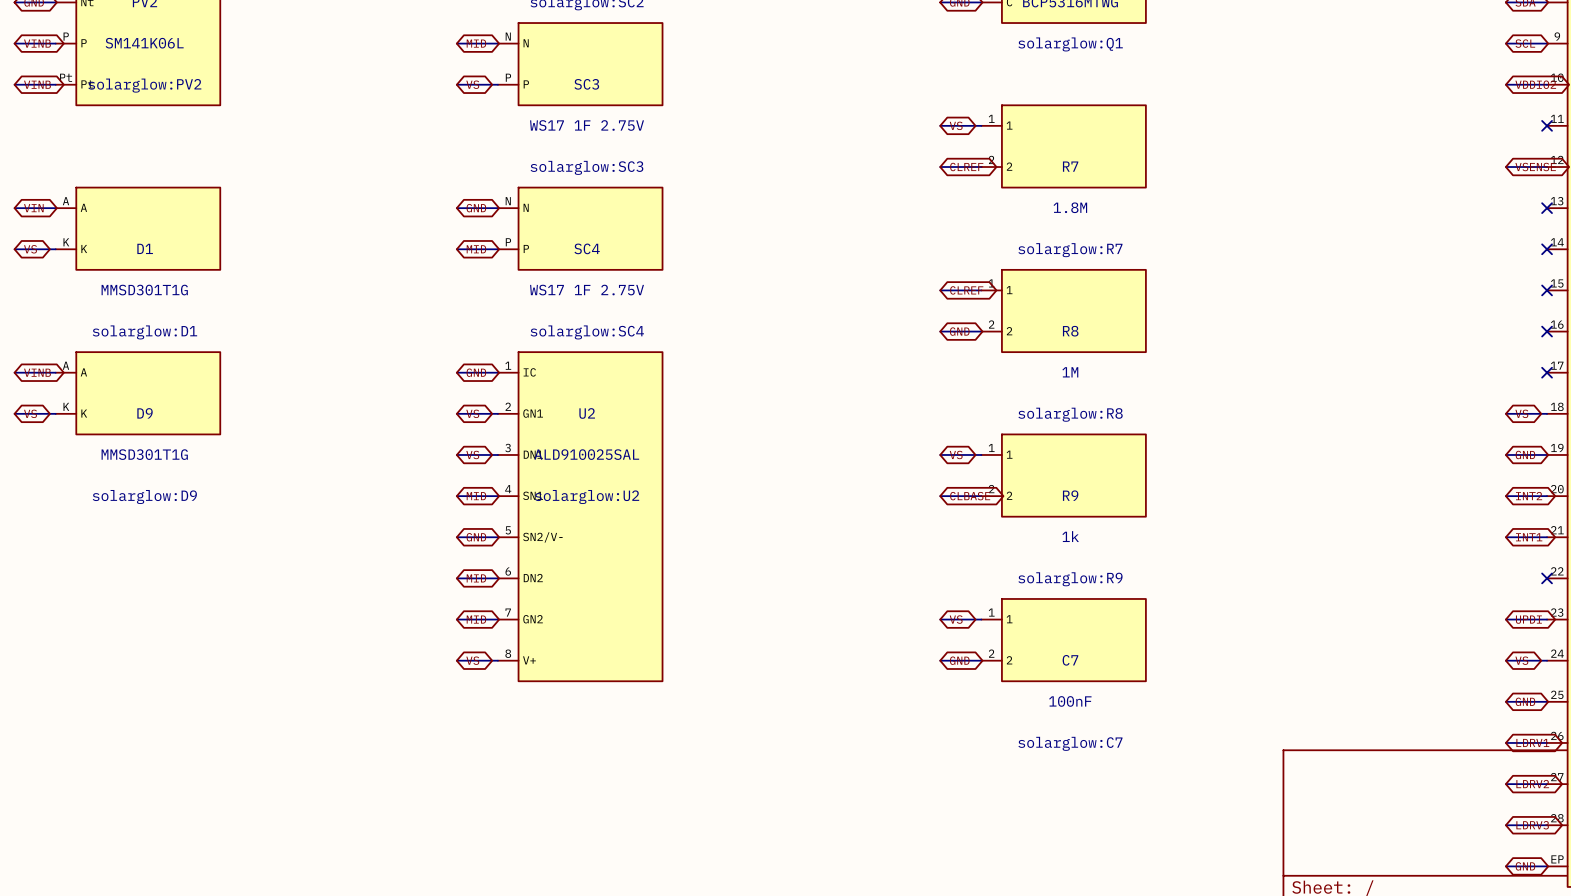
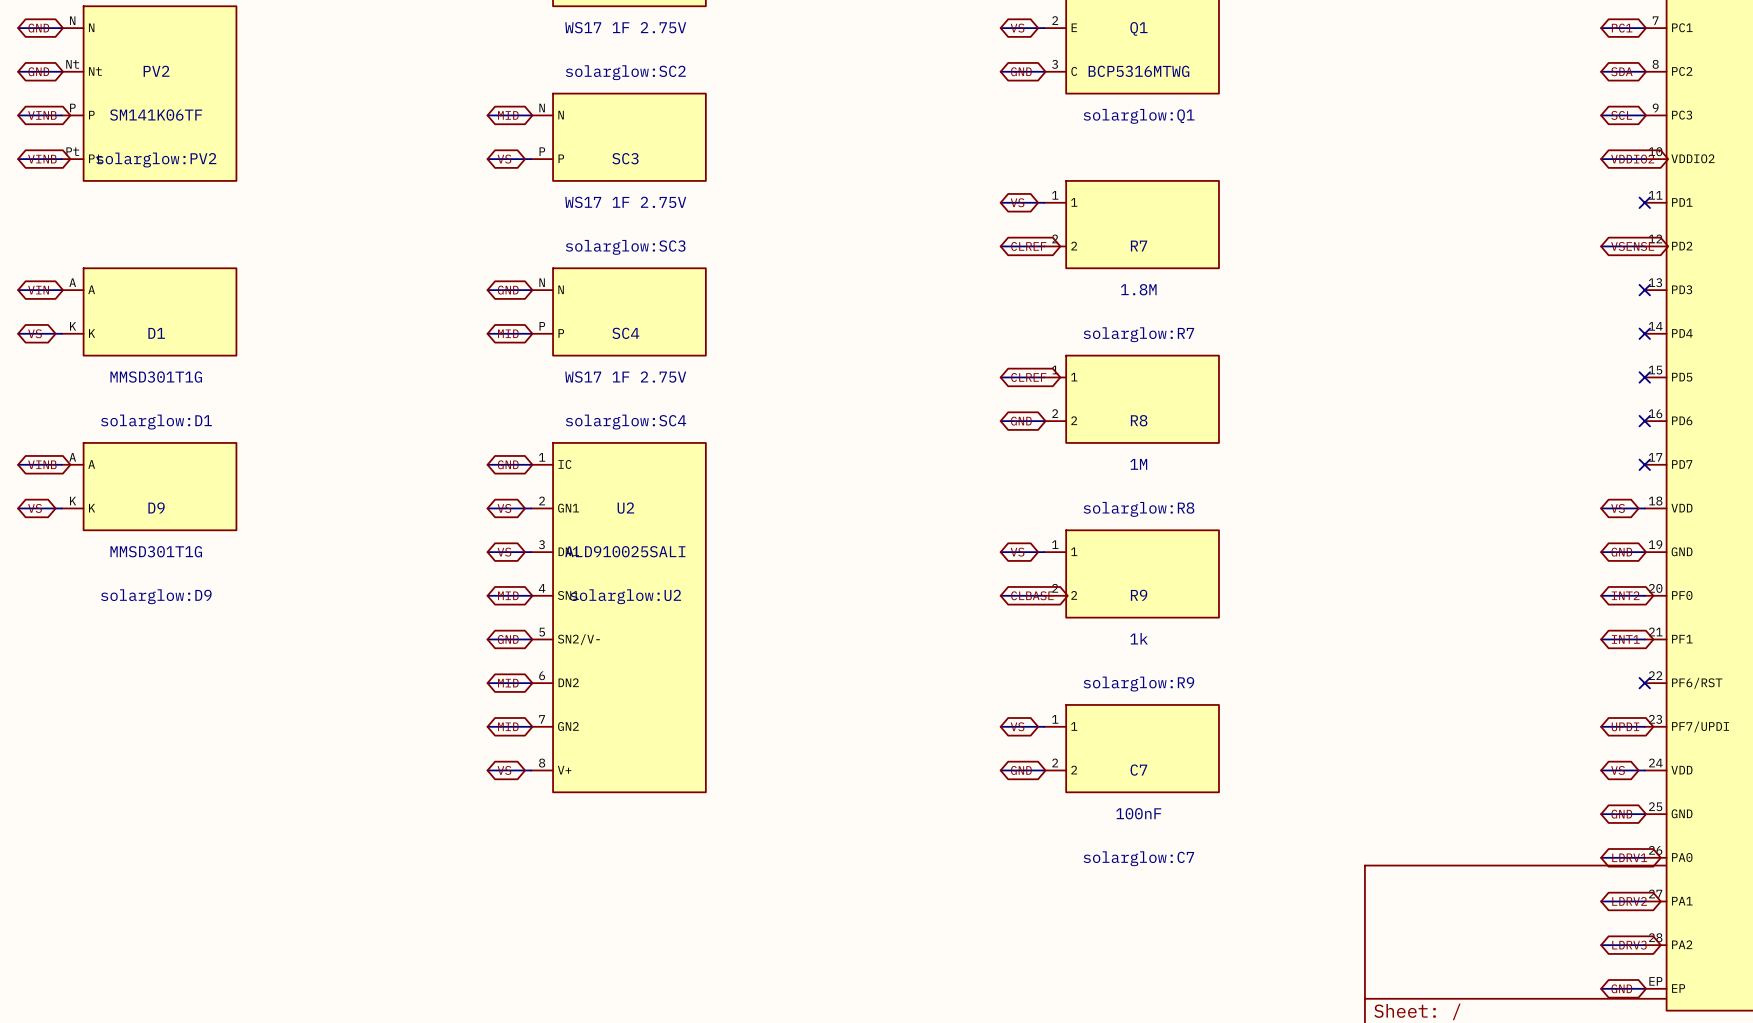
PV2 value: SM141K06L (144, 43) -> SM141K06TF (156, 115)
U2 value: ALD910025SAL (586, 454) -> ALD910025SALI (625, 551)

